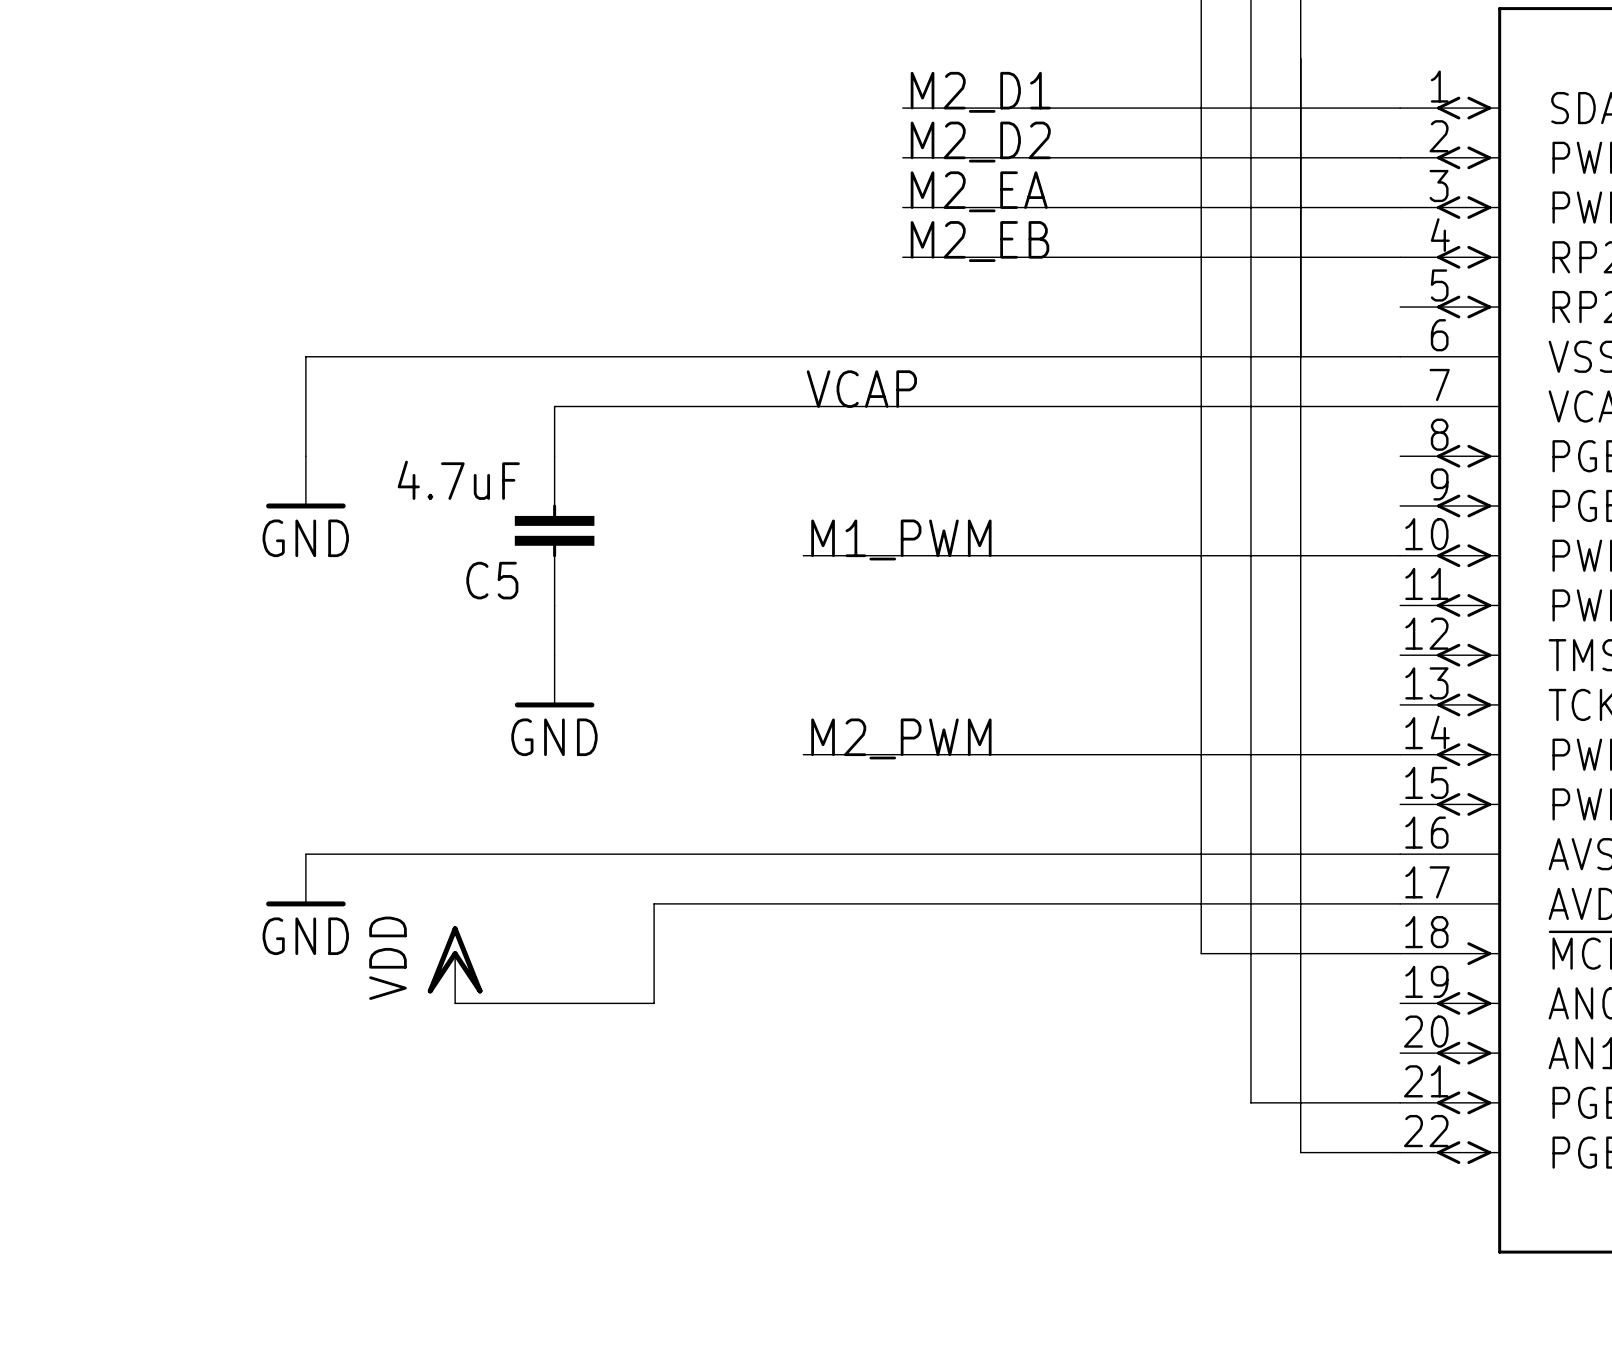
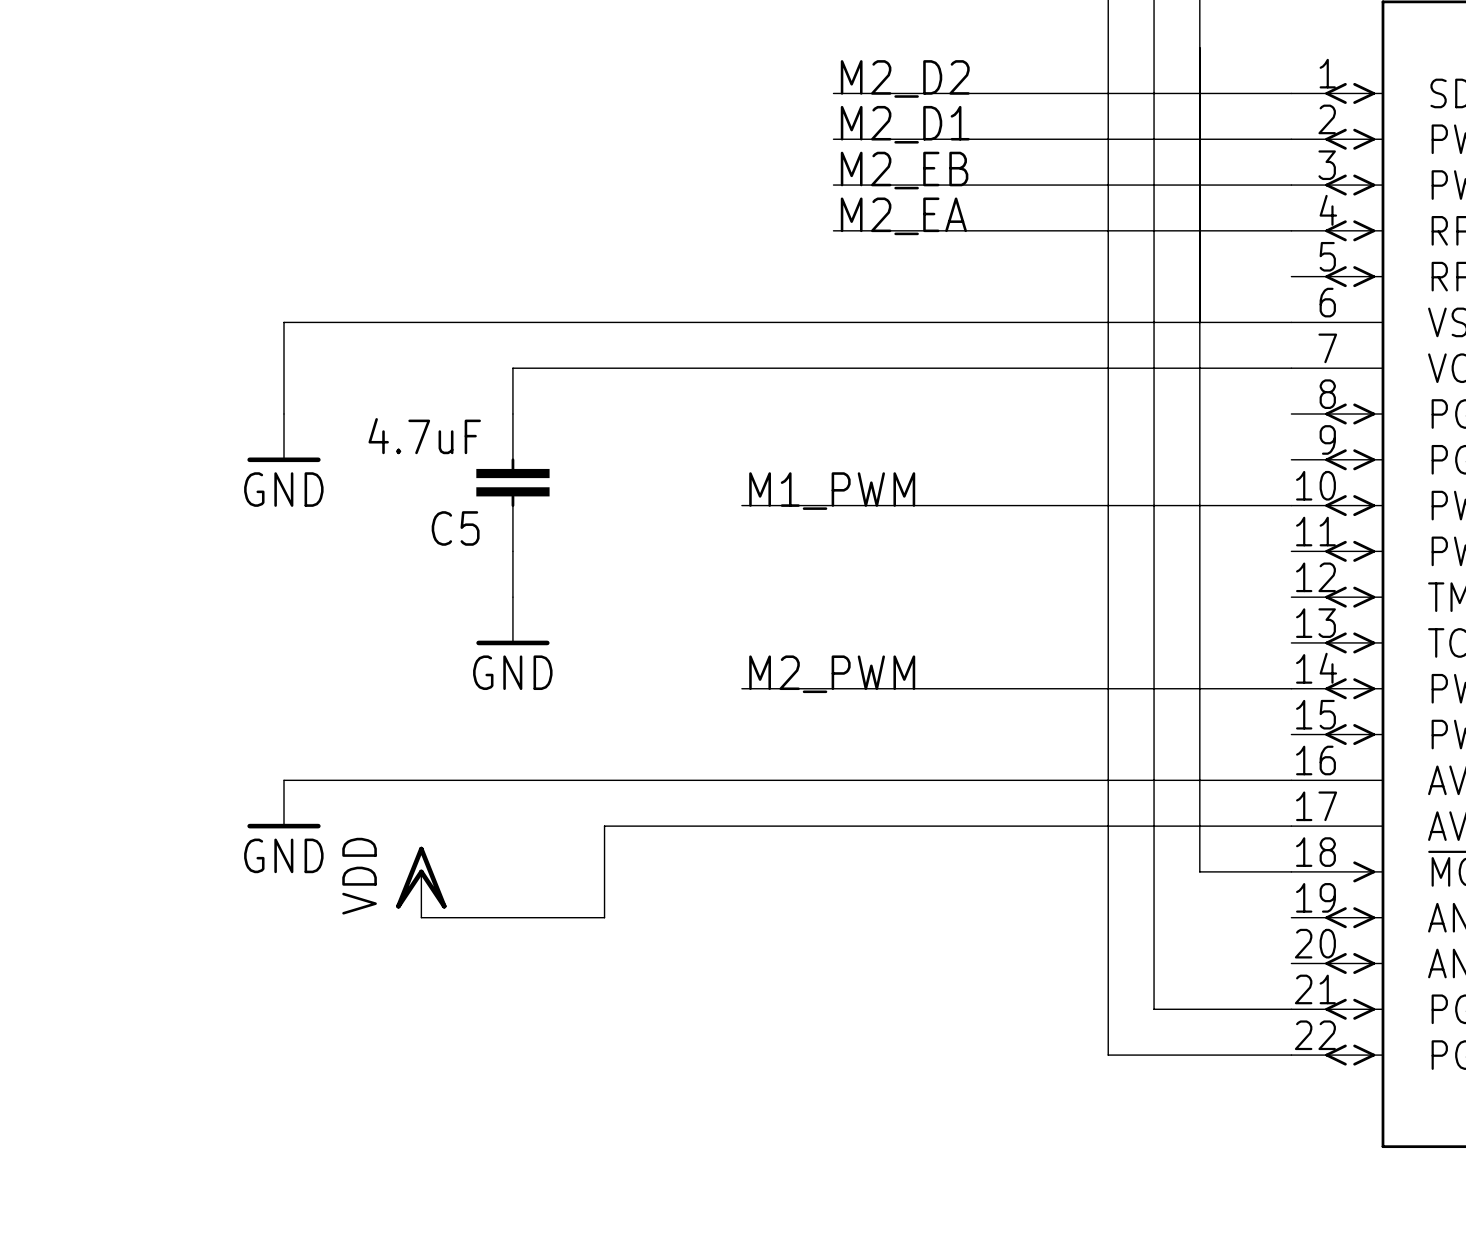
label: M2_D1 (980, 92) -> M2_D2 (905, 78)
label: M2_D2 (980, 142) -> M2_D1 (905, 124)
label: M2_EA (979, 191) -> M2_EB (904, 170)
label: M2_EB (979, 241) -> M2_EA (903, 216)
label: VCAP (861, 389) -> none
wire: (1201, 953) (1300, 953) (1300, 1152) -> (1108, 871) (1108, 1055) (1199, 1055)

